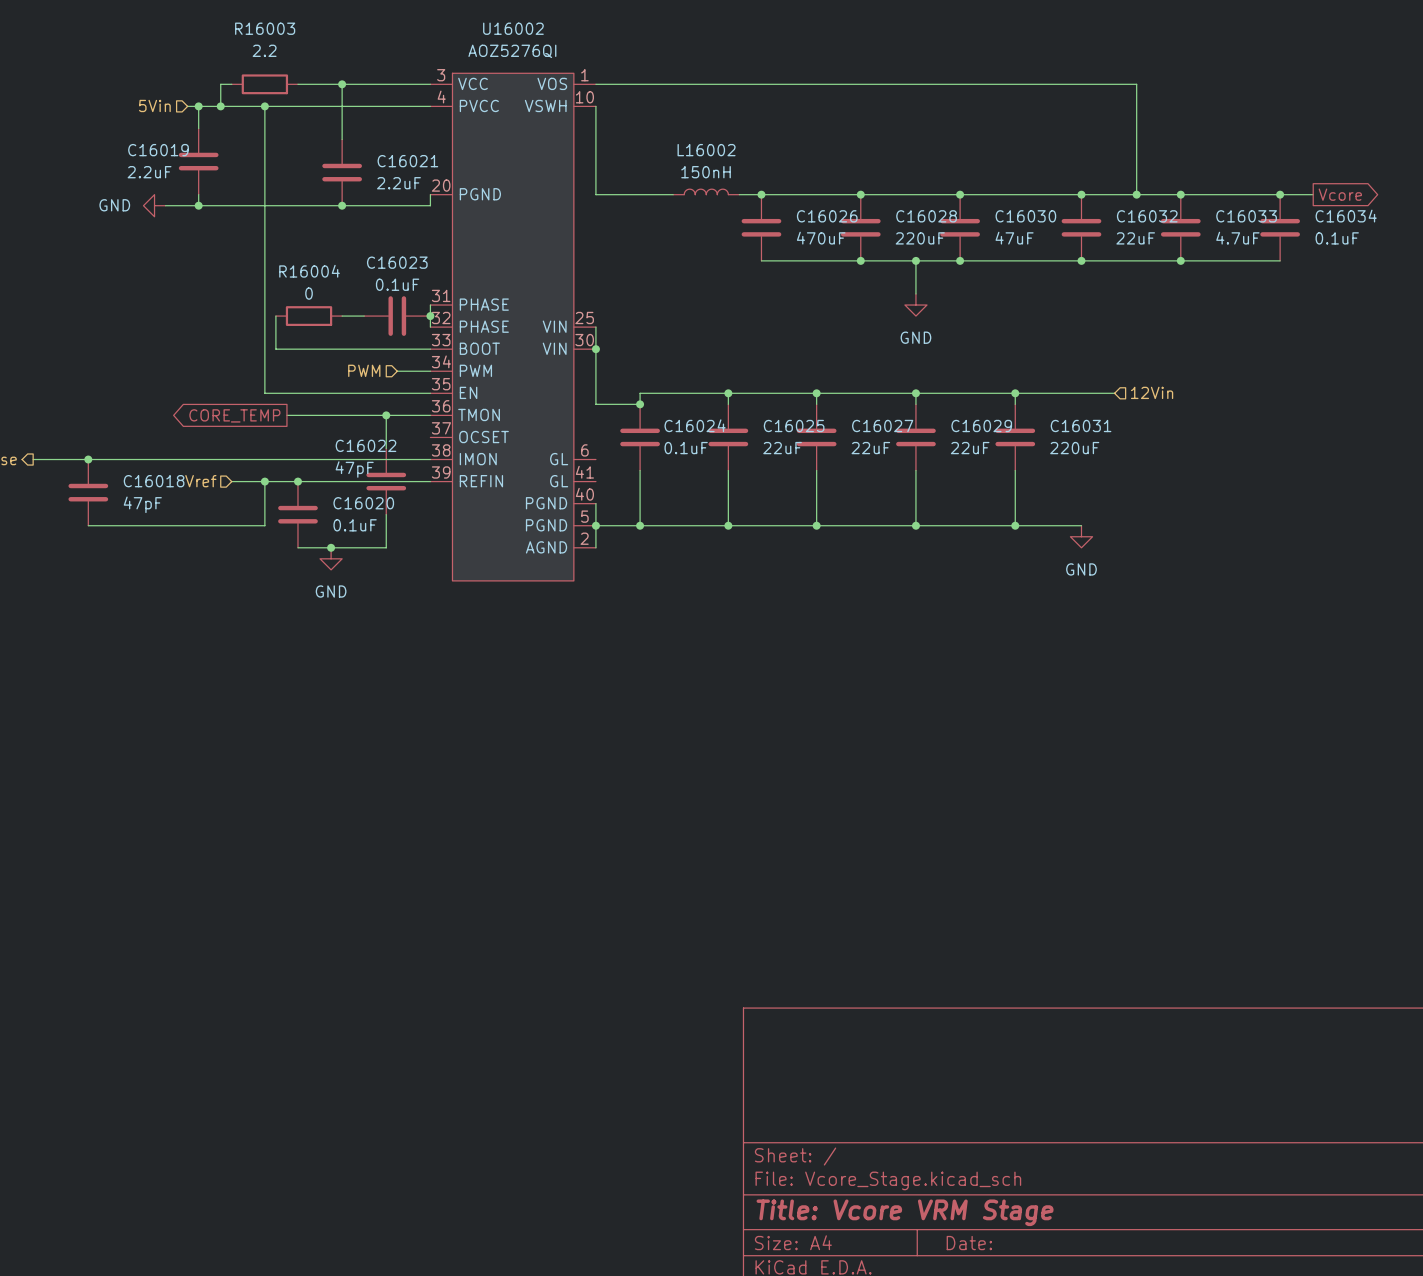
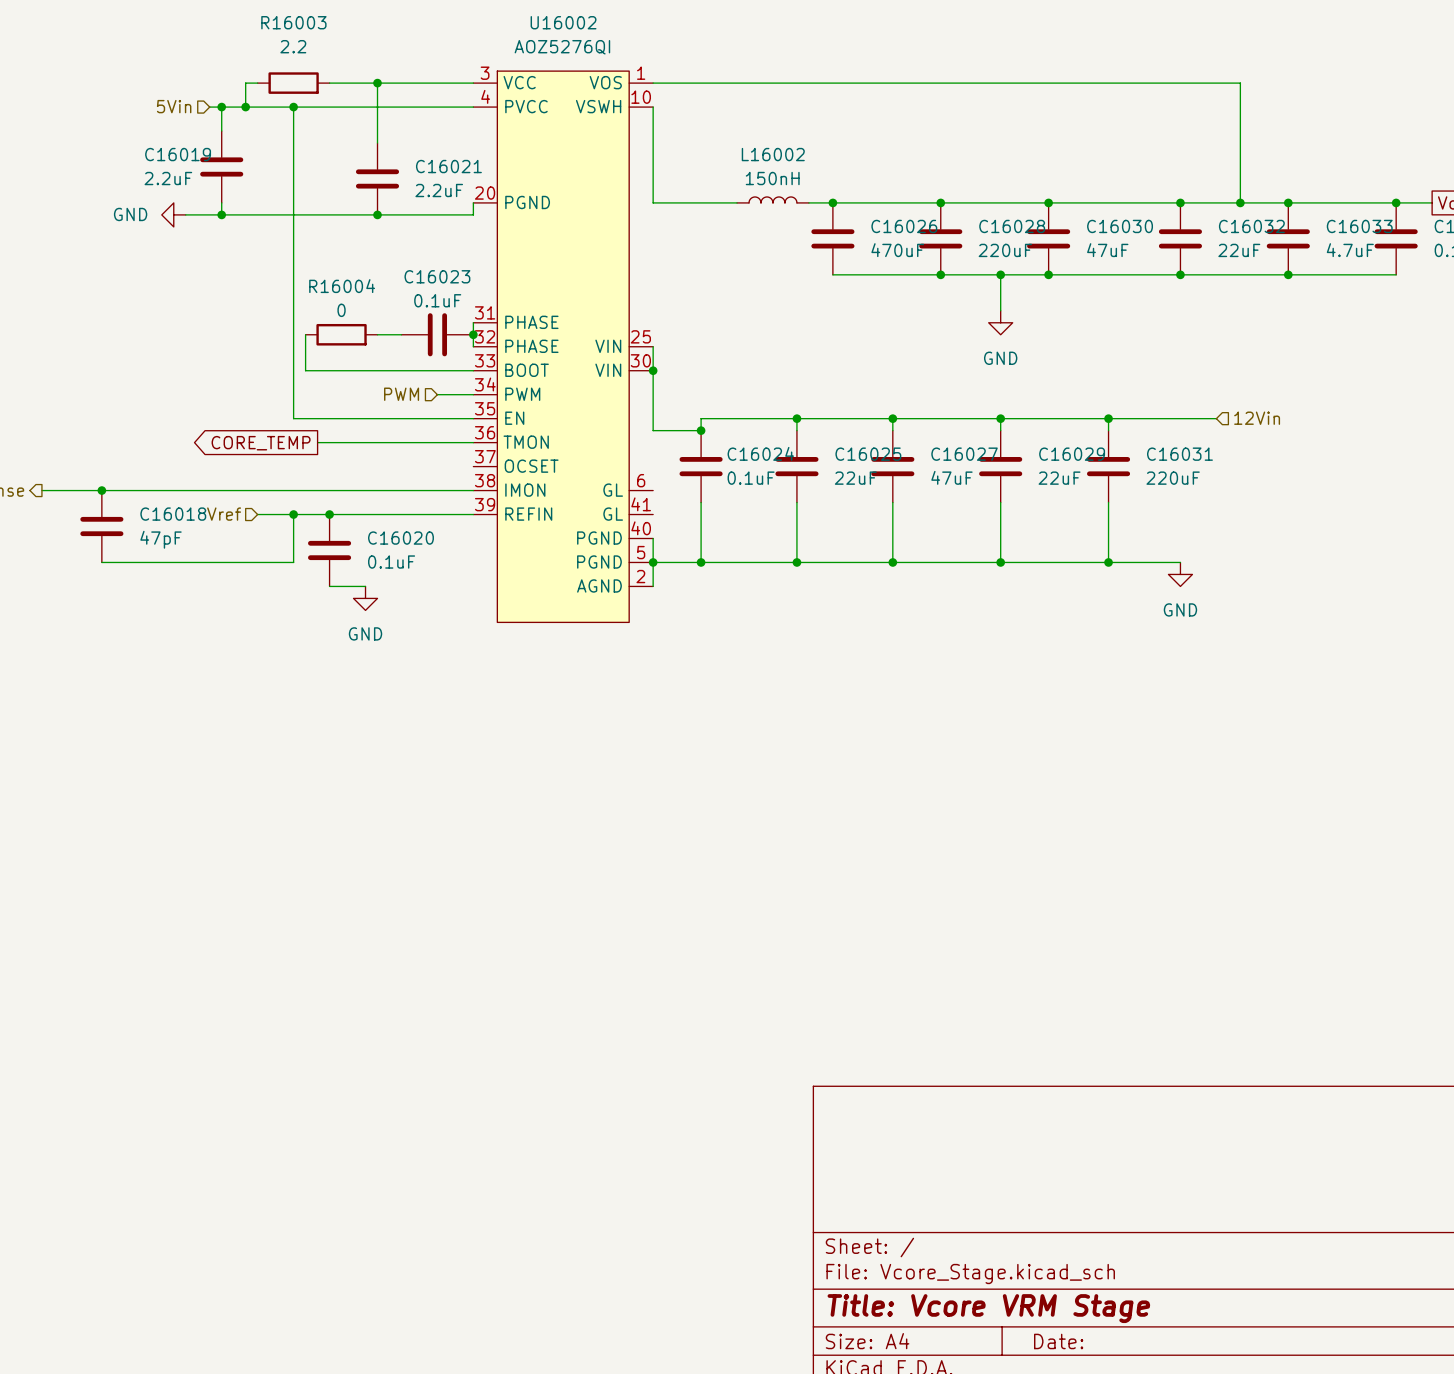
wire: (386, 415) (386, 448) -> none
junction: (386, 415) -> none
C16027 value: 22uF (870, 448) -> 47uF (951, 477)
C16022: 47pF (386, 481) -> none
wire: (386, 514) (386, 547) (331, 547) -> none
junction: (331, 547) -> none

